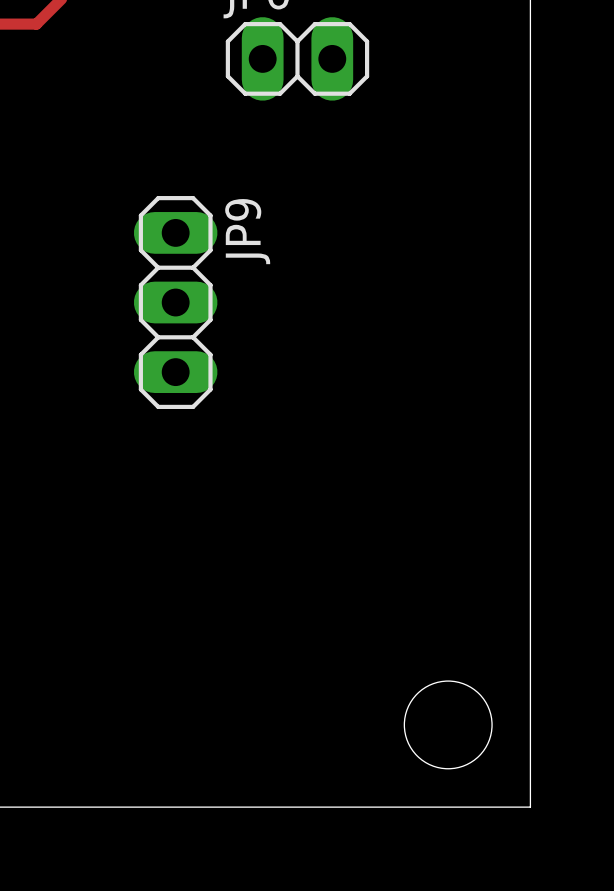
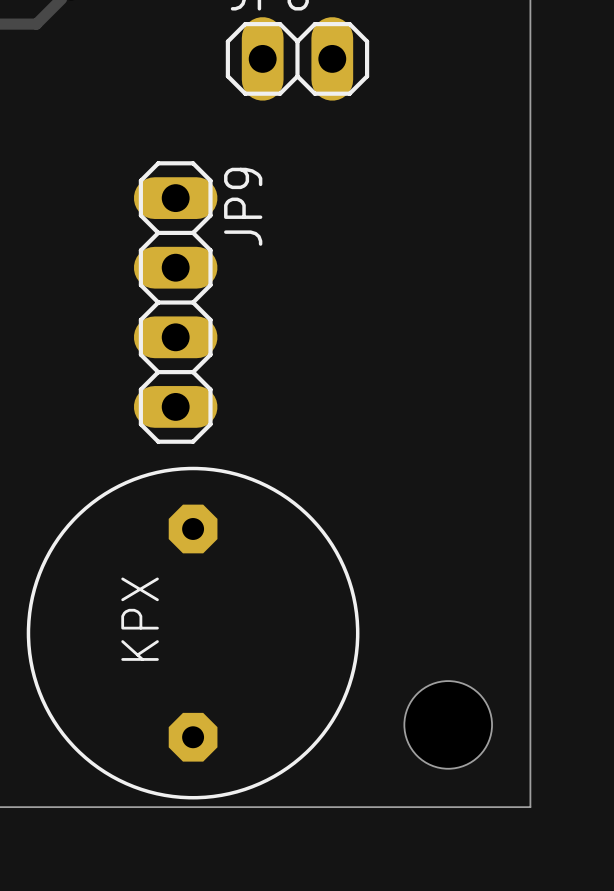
JP9 footprint: [133, 196, 218, 410] -> [133, 161, 218, 444]
part: none -> (193, 633)

